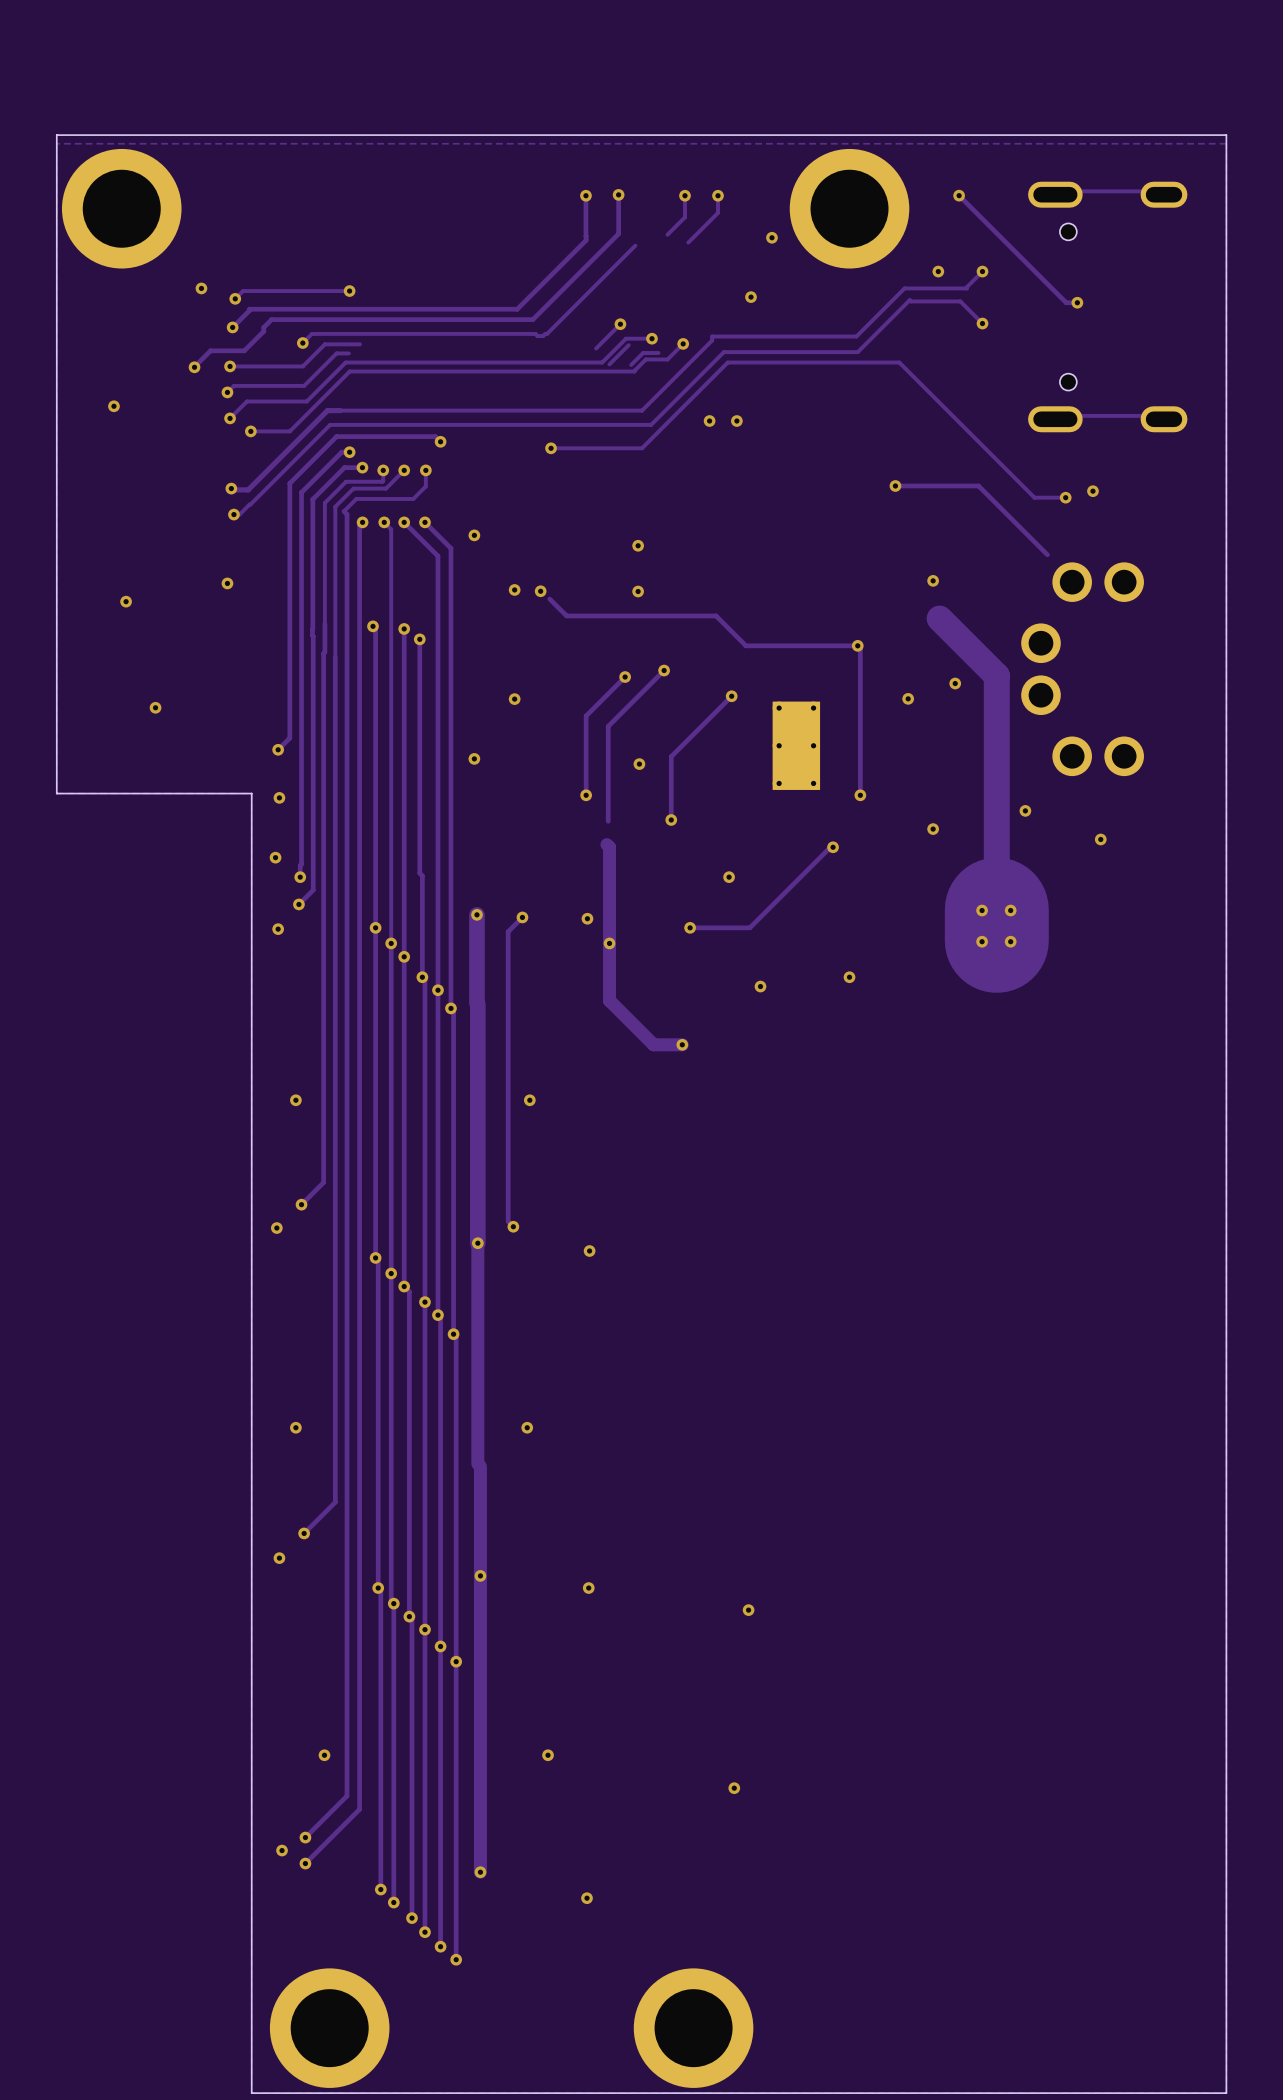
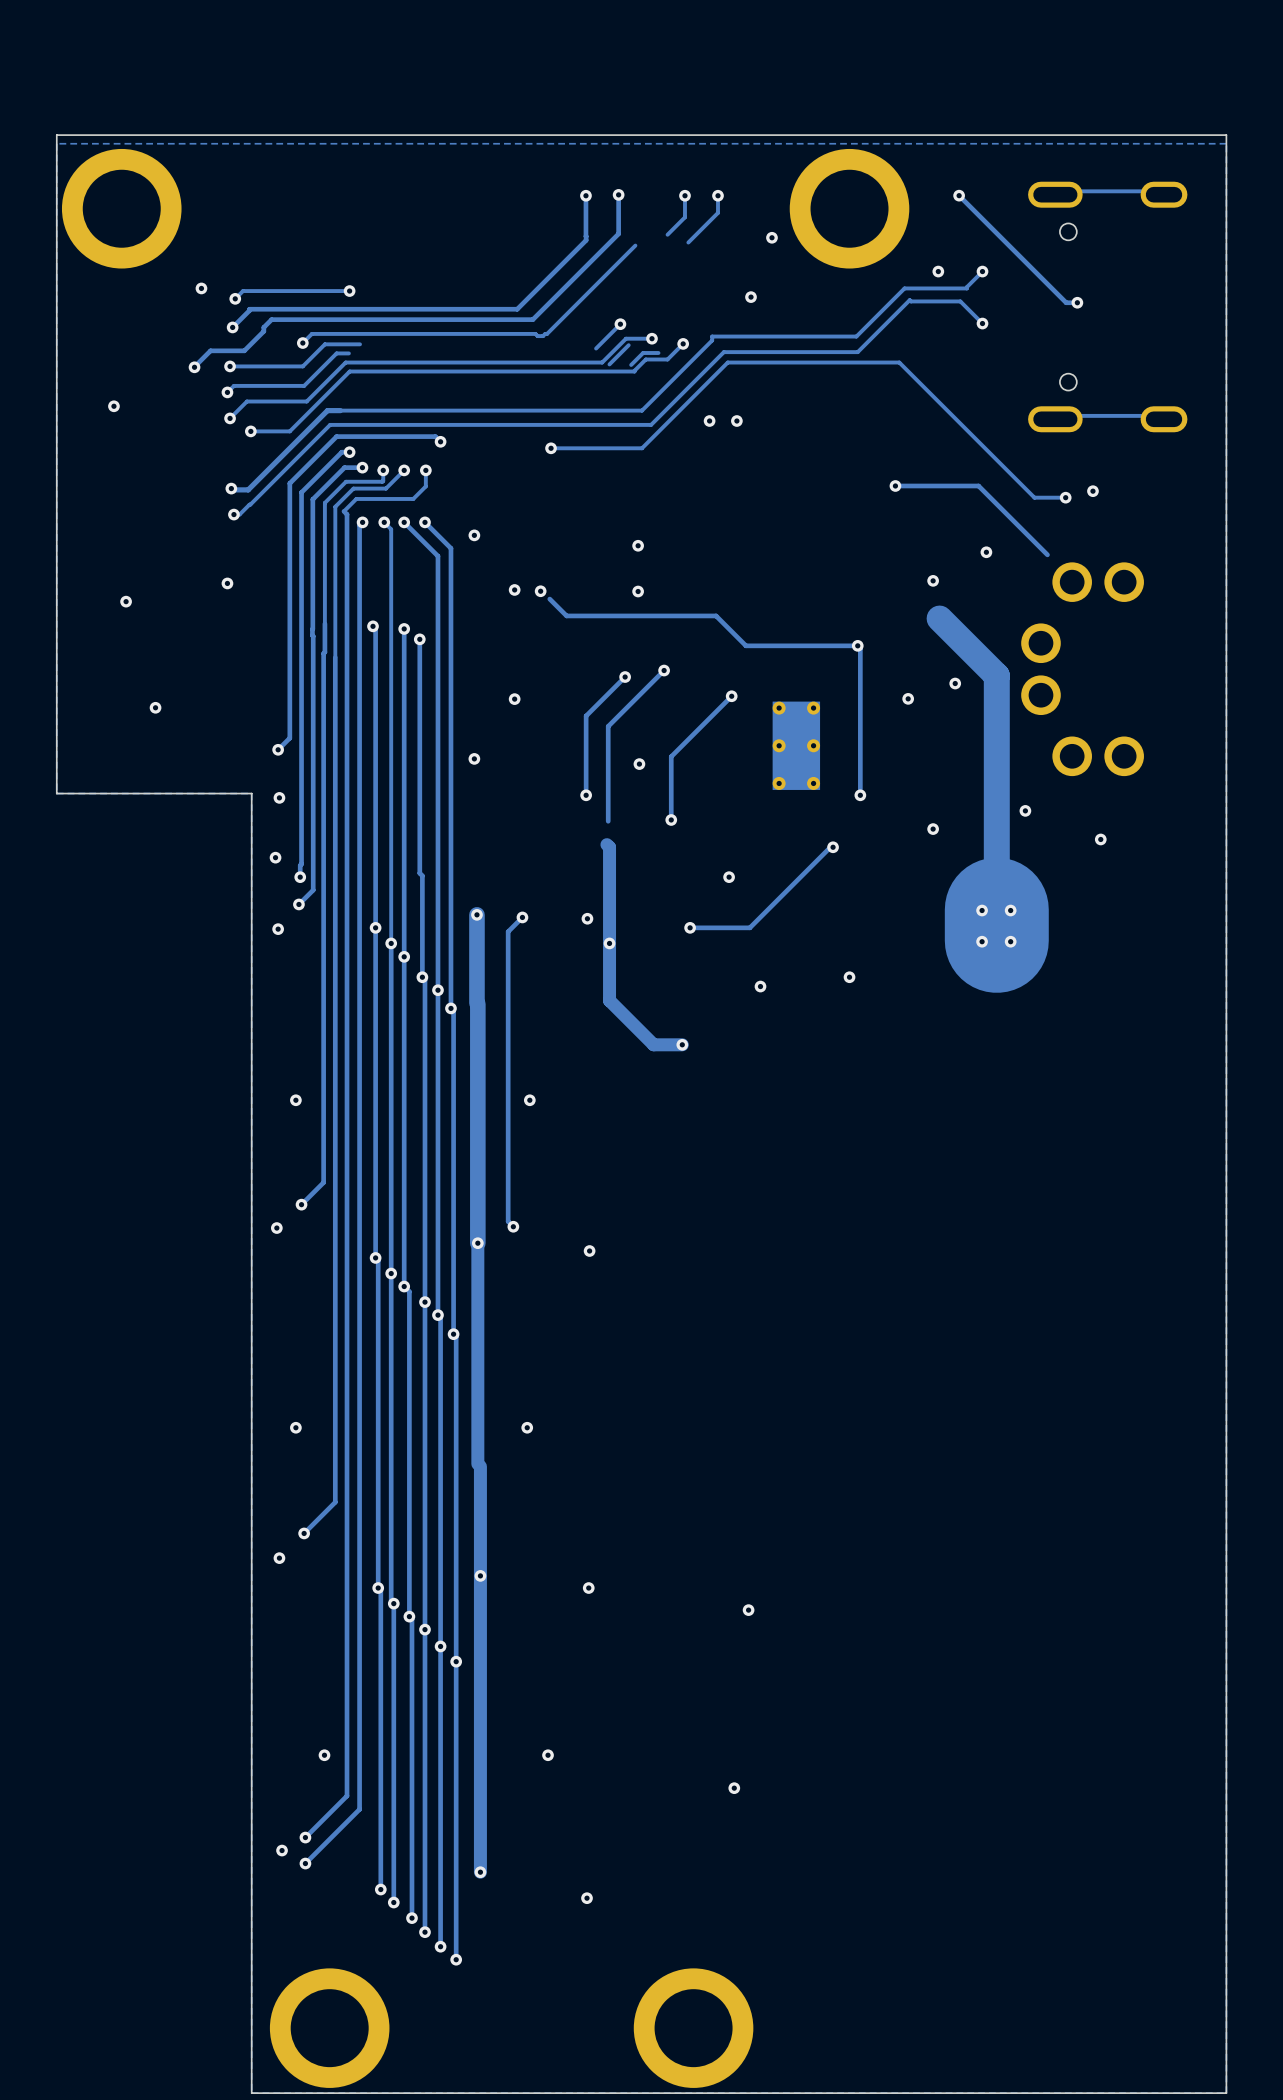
via: none -> (986, 552)

